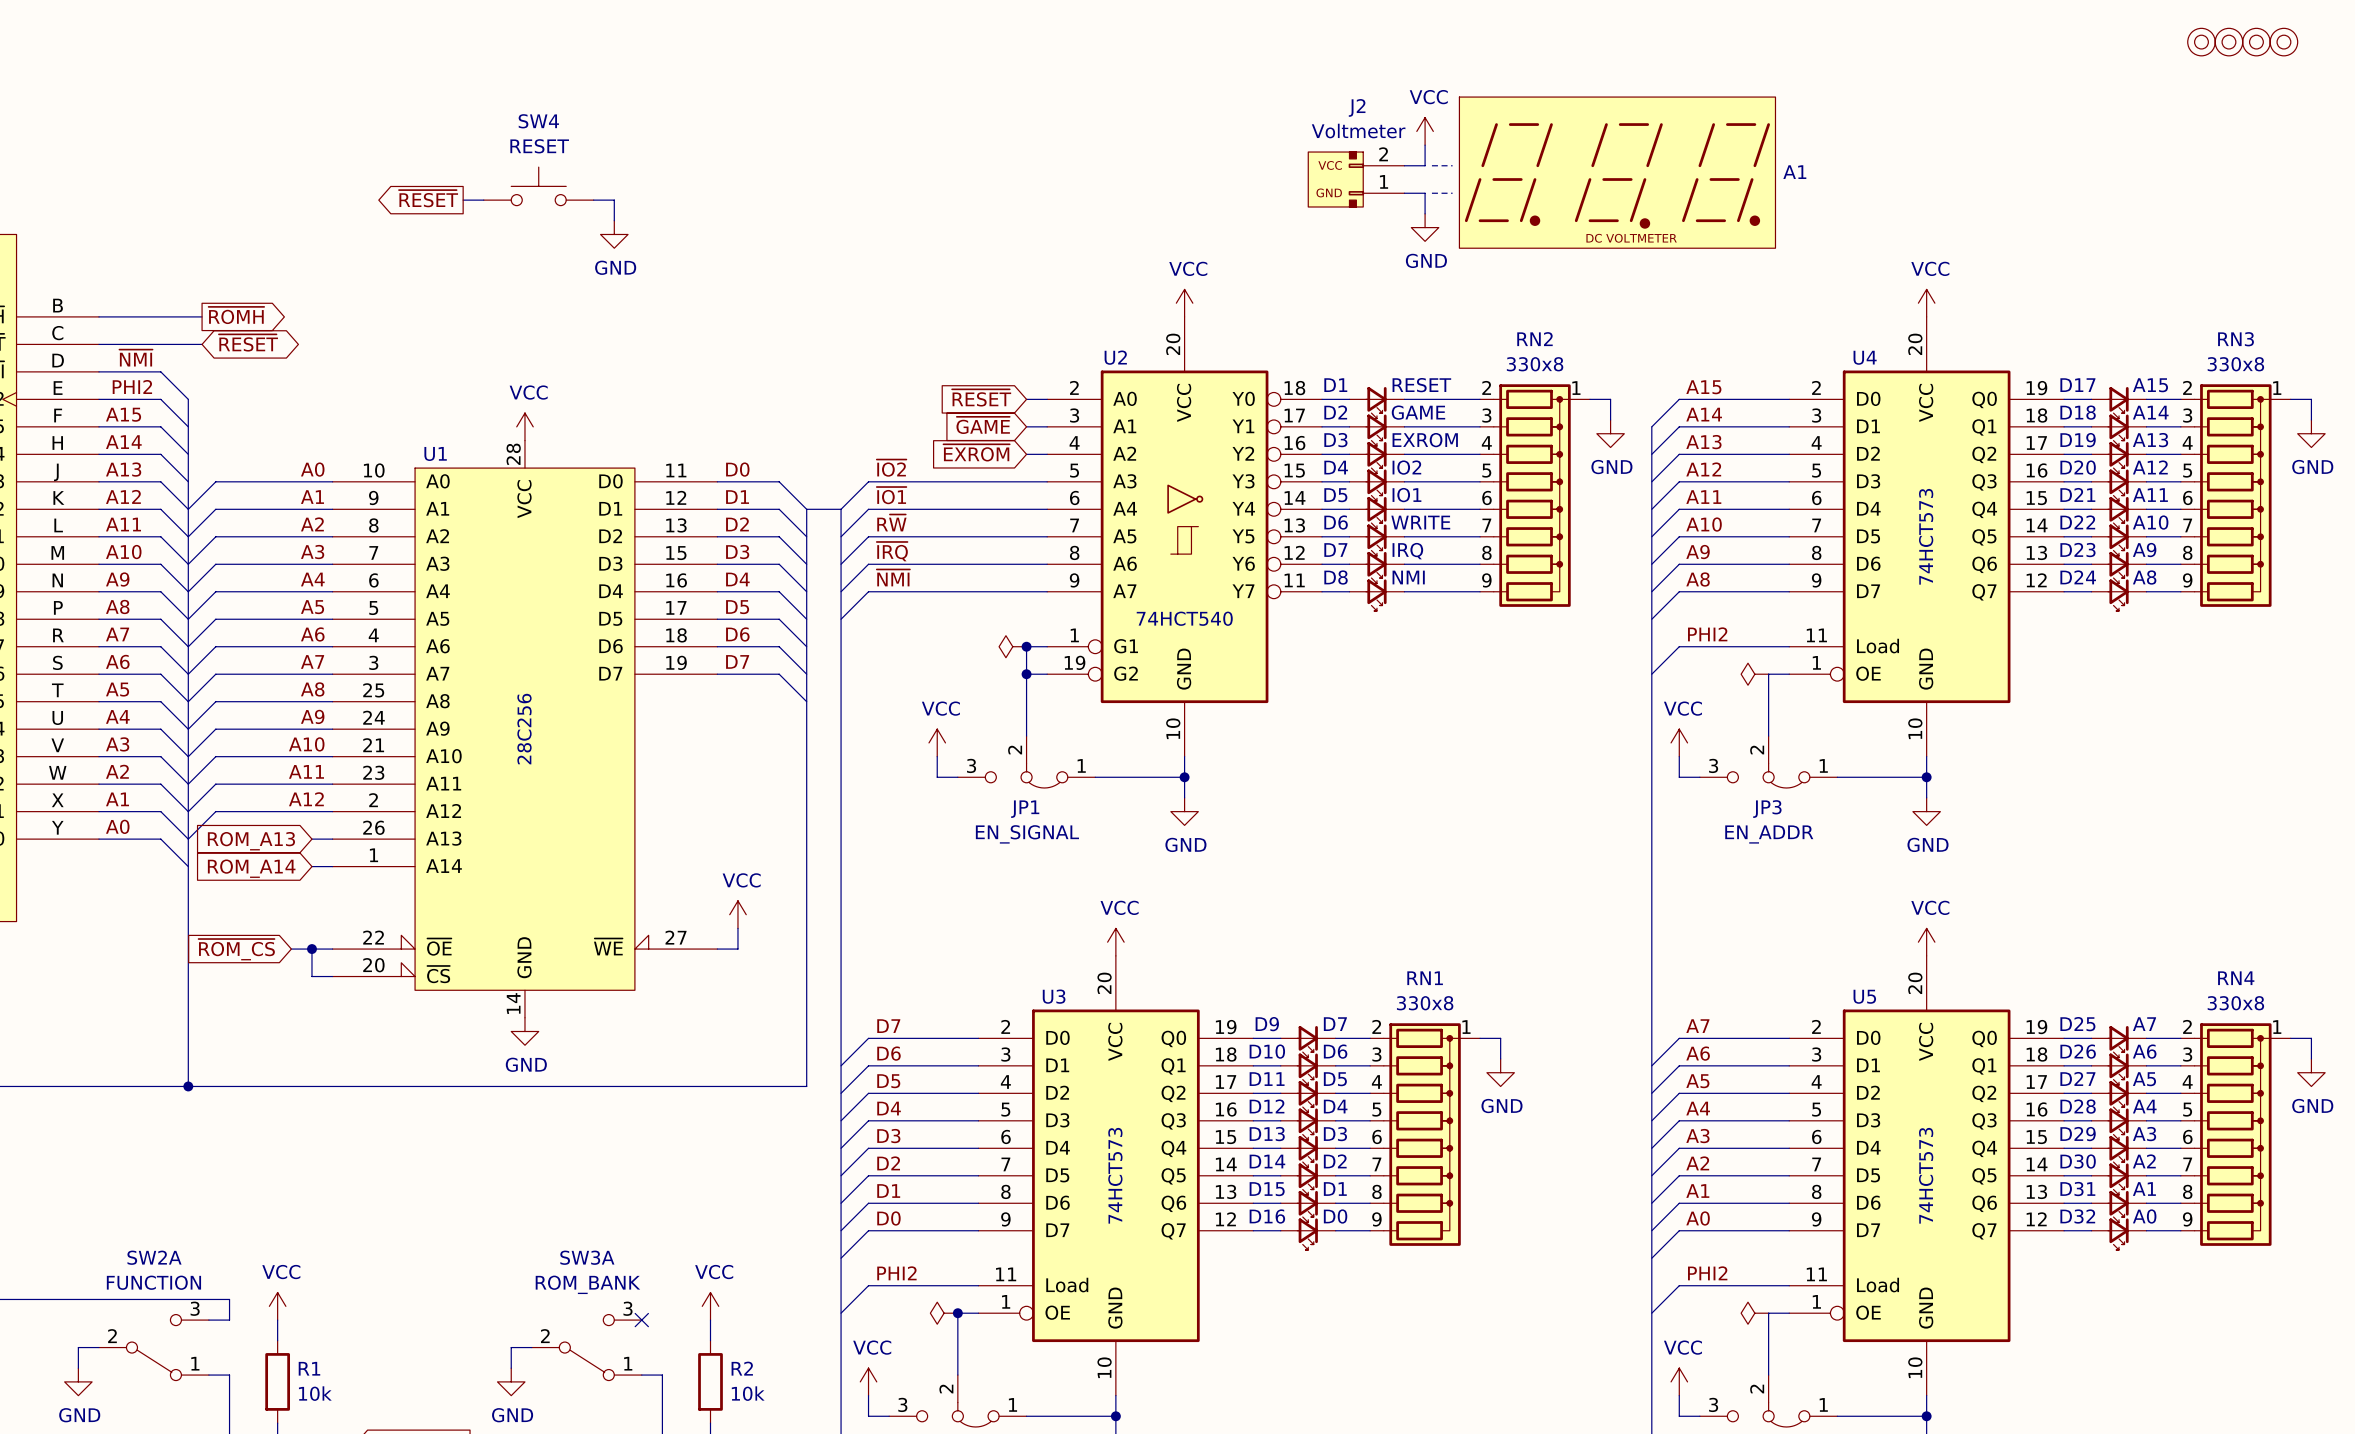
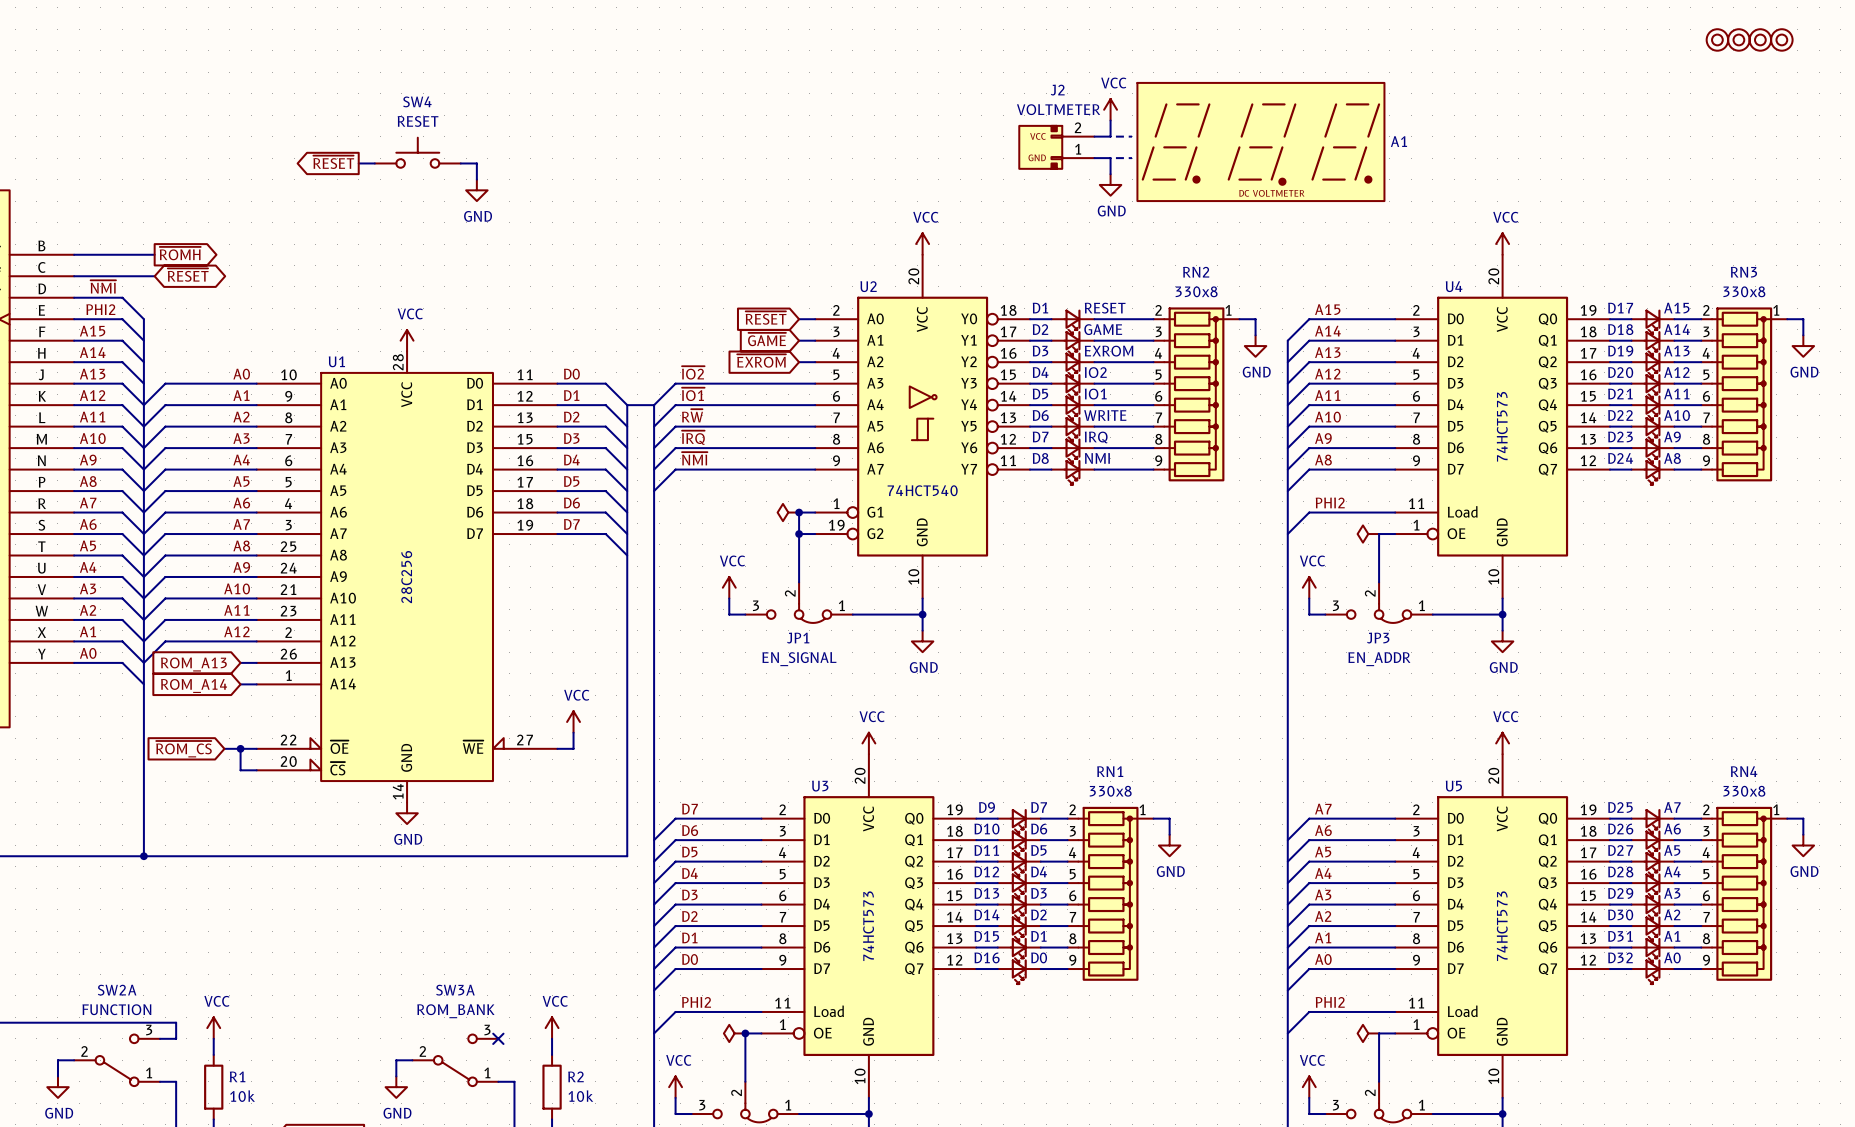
J2 value: Voltmeter (1358, 131) -> VOLTMETER (1058, 109)

